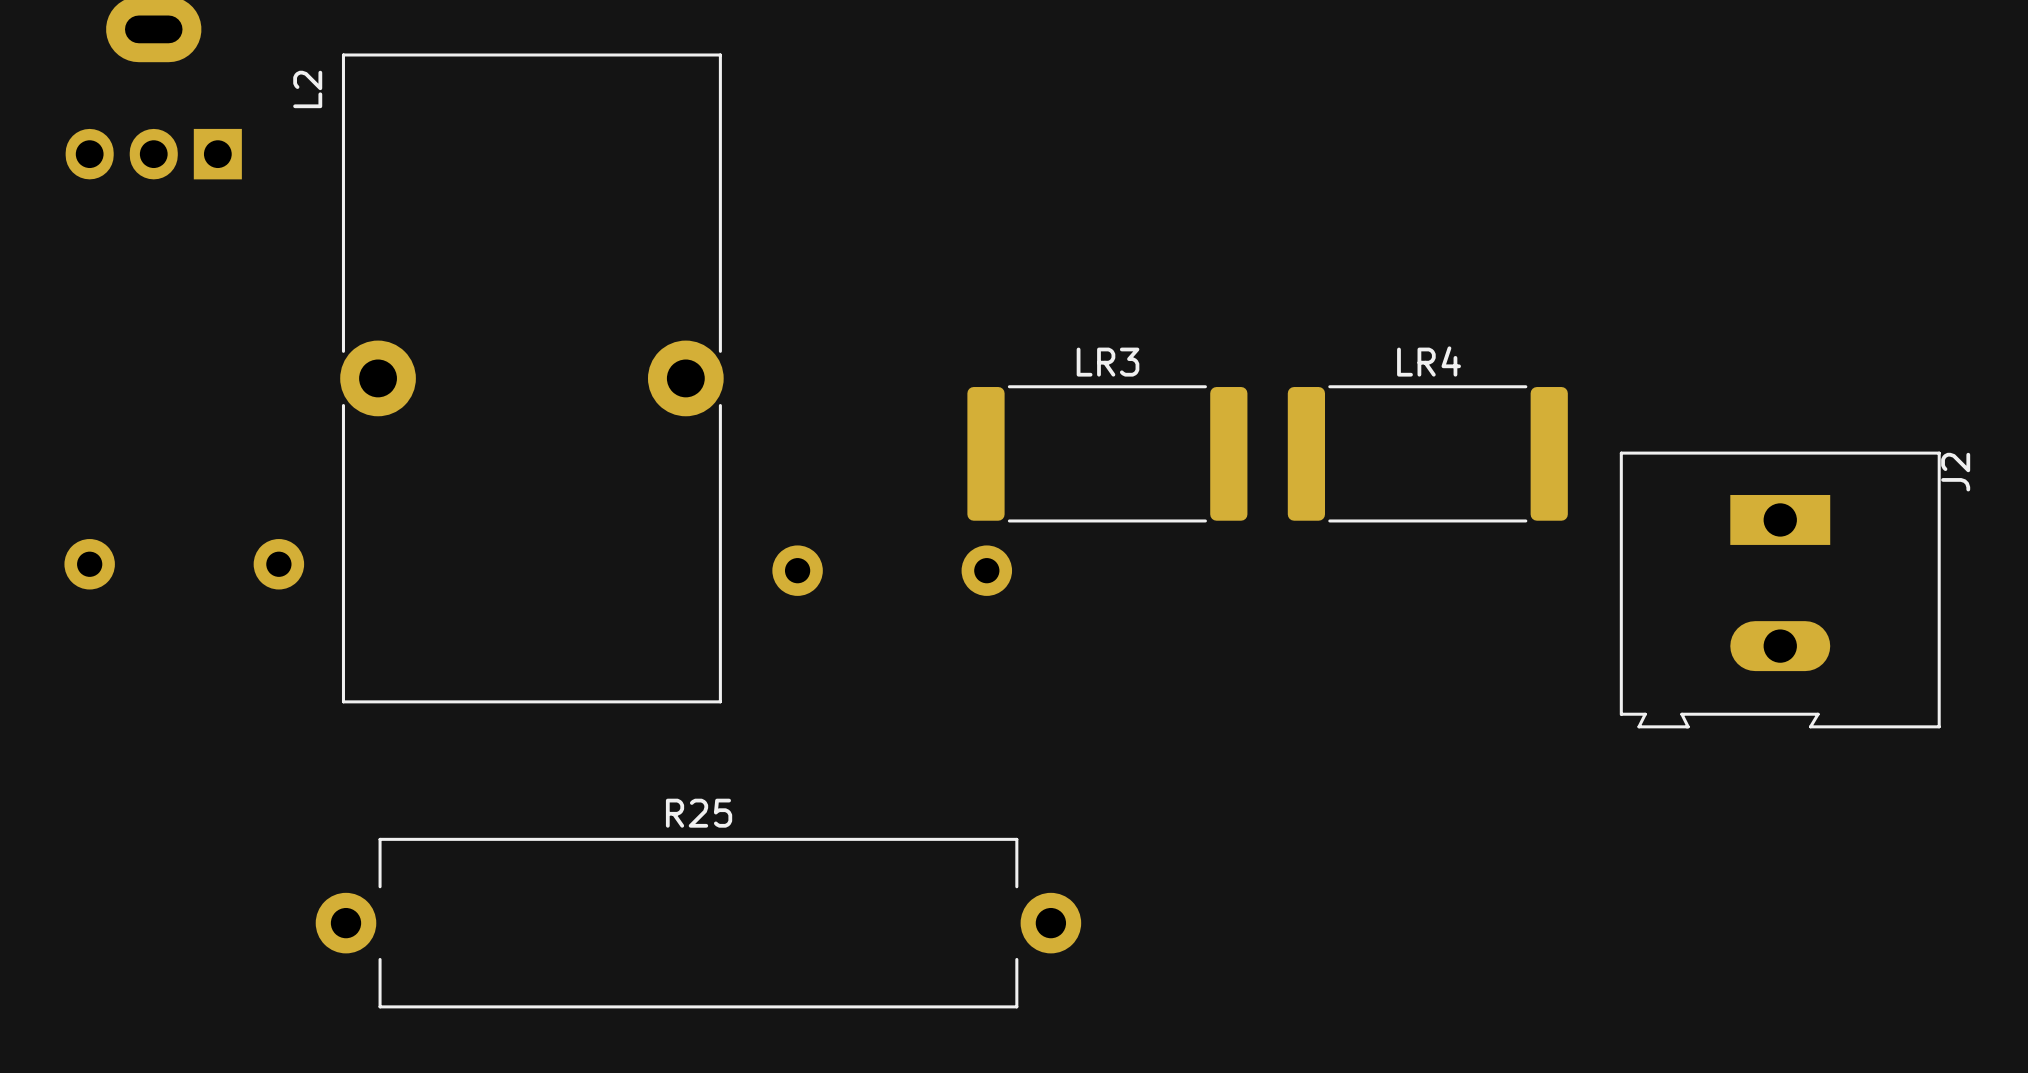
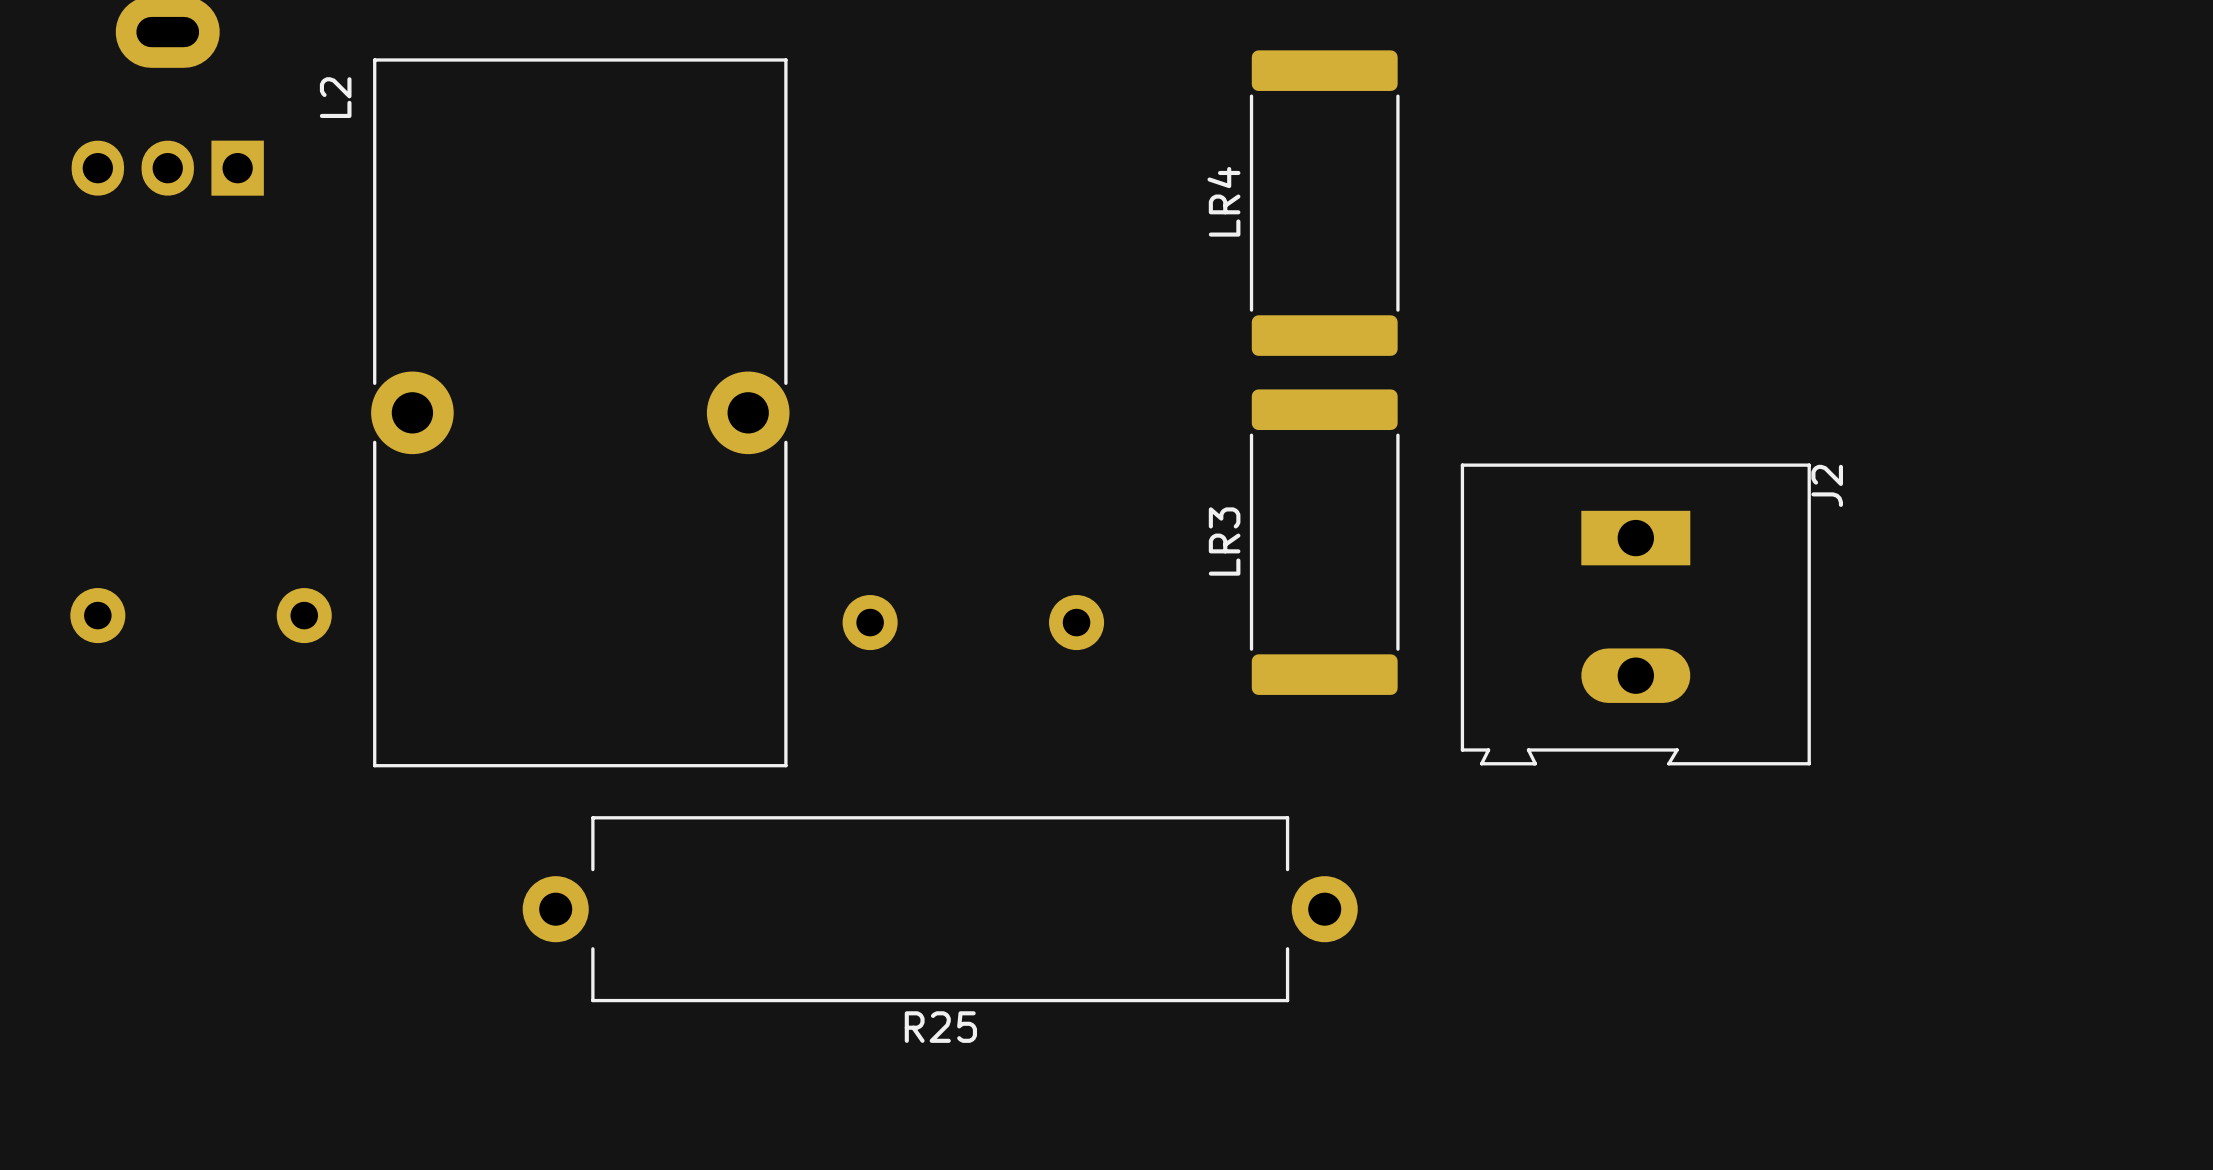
LR4 name position: LR4 (1429, 361) -> LR4 (1223, 201)
LR3 name position: LR3 (1108, 362) -> LR3 (1224, 541)
LR3 rotation: 0° (1107, 453) -> 90° clockwise (1324, 542)
LR4 rotation: 0° (1427, 453) -> 90° clockwise (1324, 203)
LR4 position: (1427, 453) -> (1324, 203)
J2 position: (1780, 589) -> (1635, 614)
R25 name position: R25 (699, 813) -> R25 (940, 1027)
R25 position: (698, 923) -> (940, 909)

